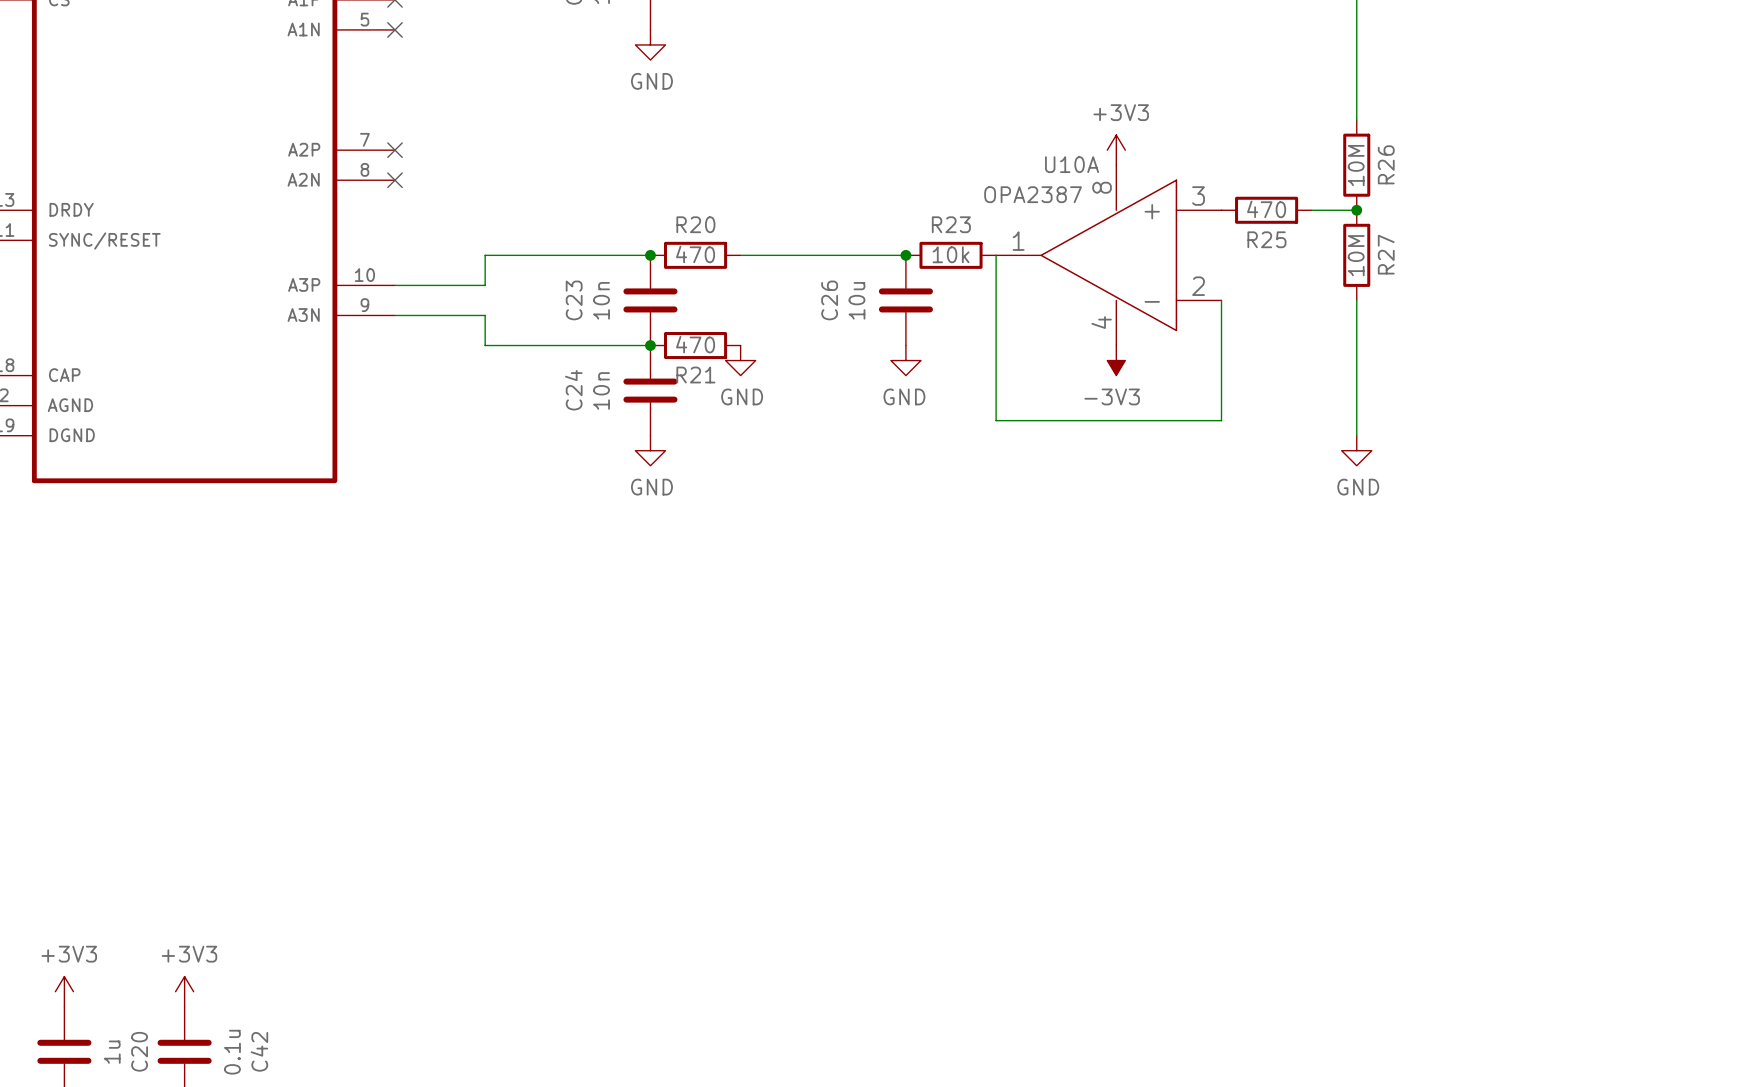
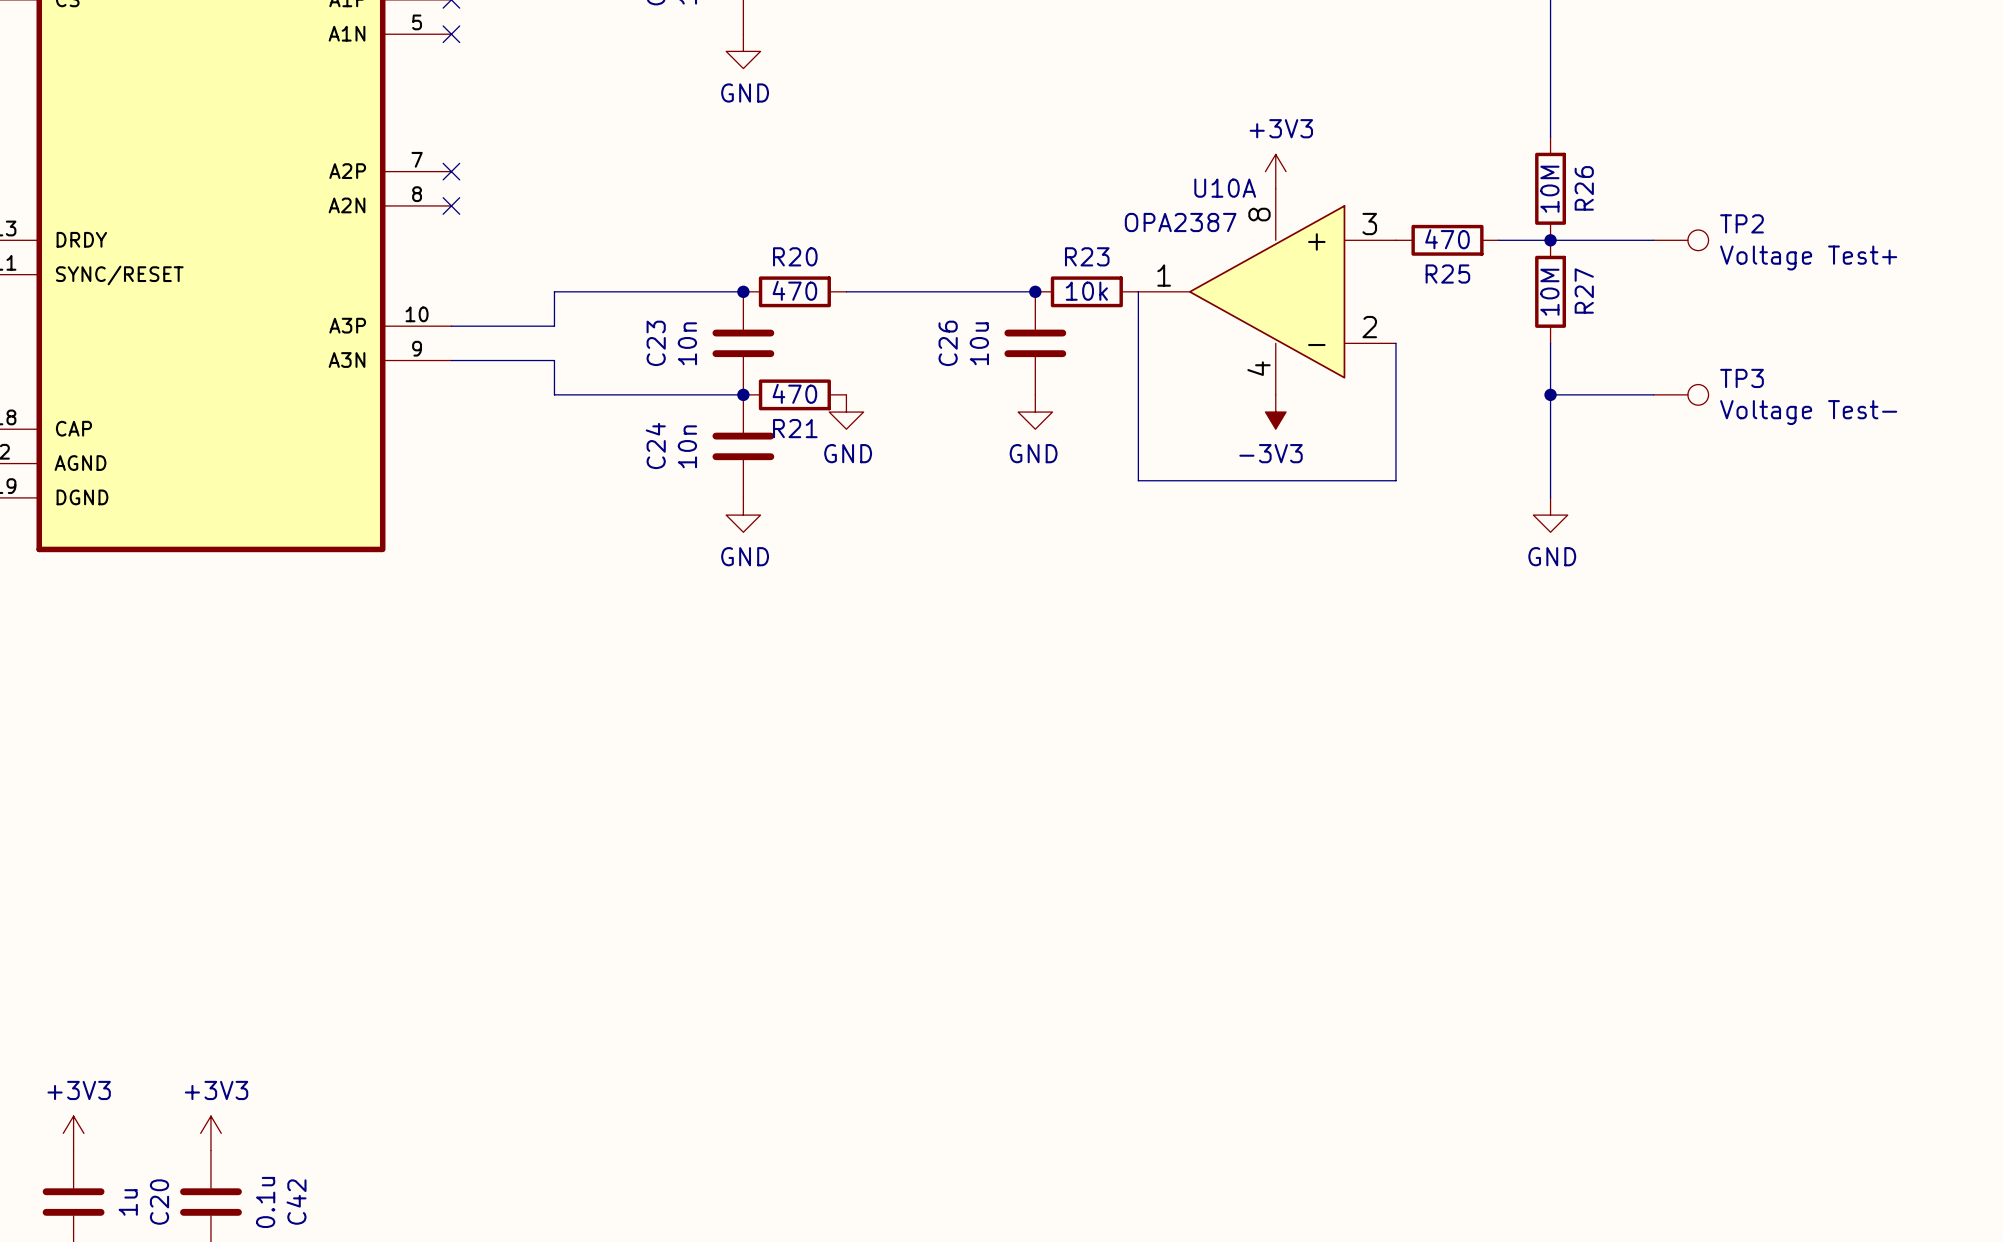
wire: none -> (1550, 240) (1653, 240)
TP2: none -> Voltage Test+ (1681, 240)
wire: none -> (1550, 394) (1653, 394)
junction: none -> (1550, 394)
TP3: none -> Voltage Test- (1681, 394)

